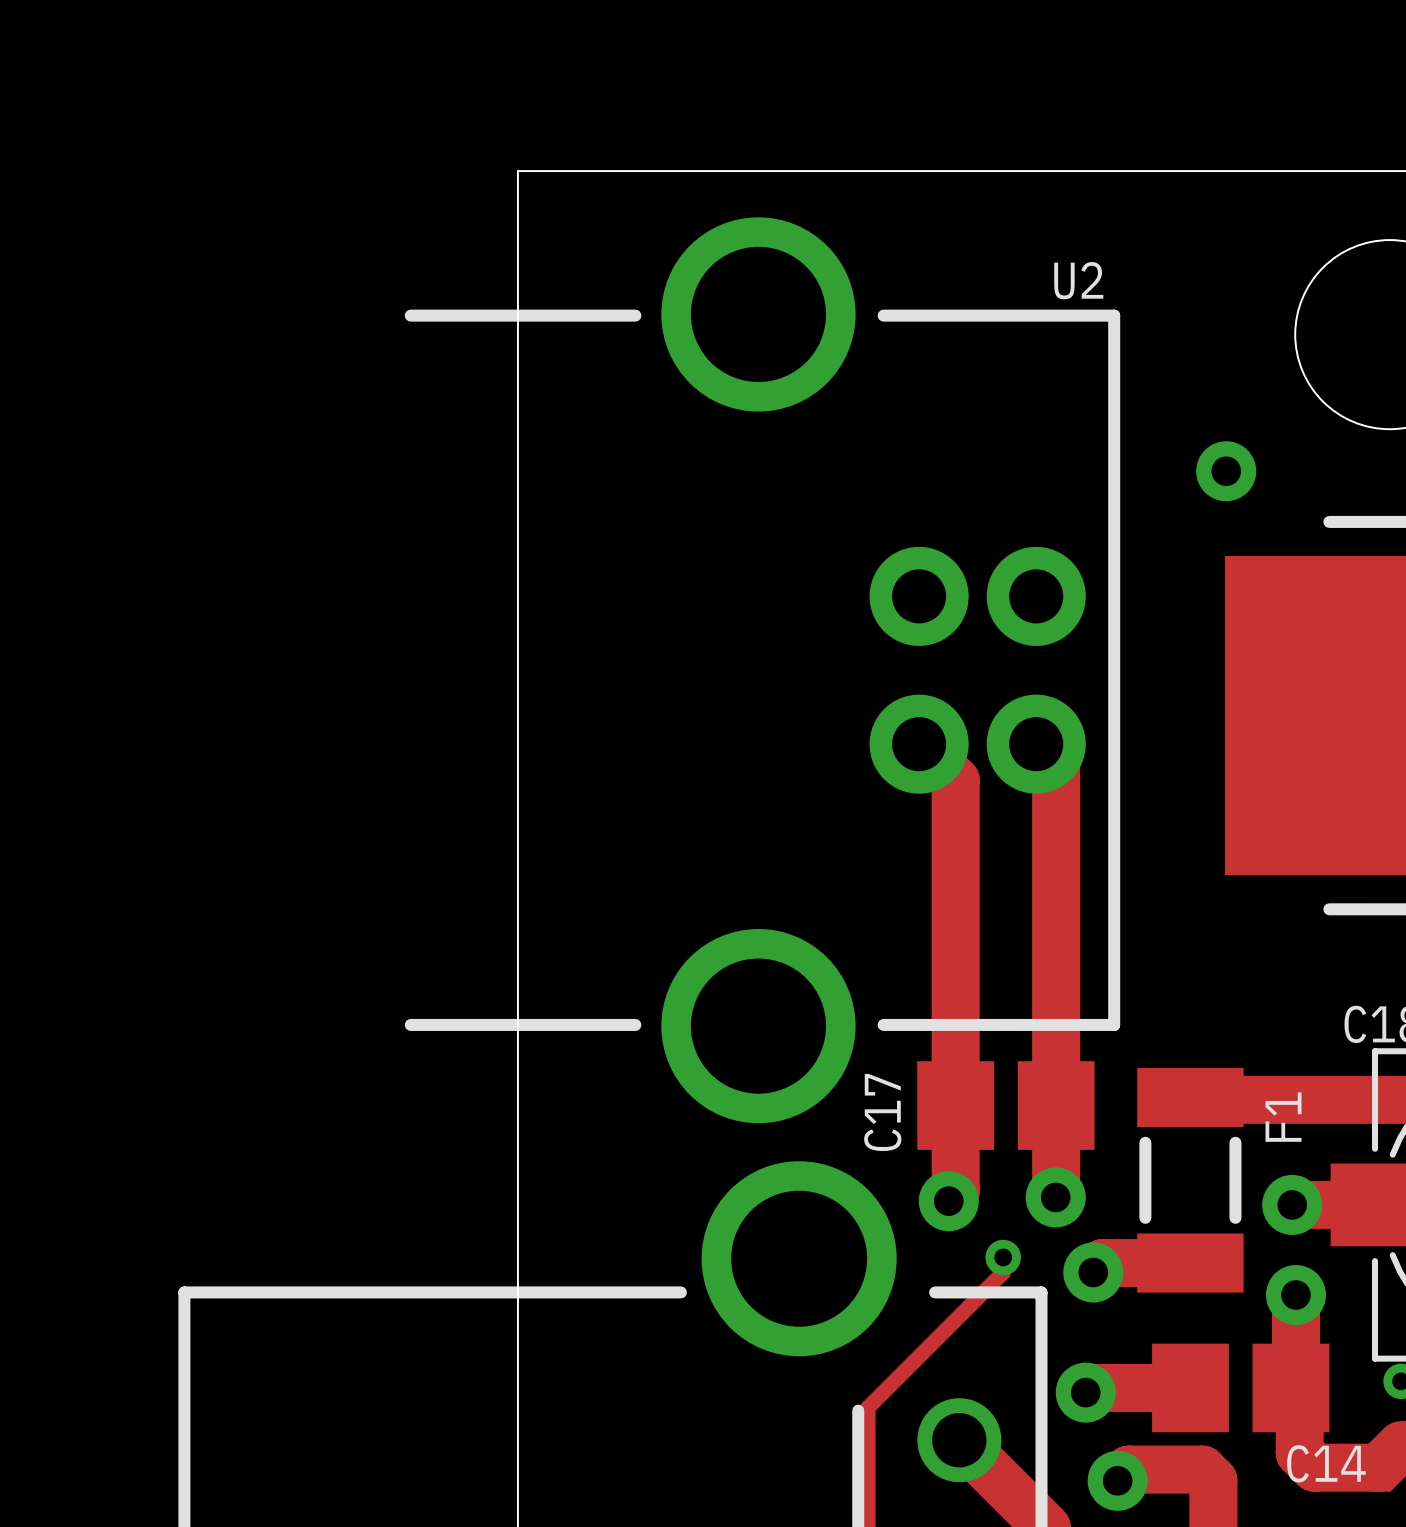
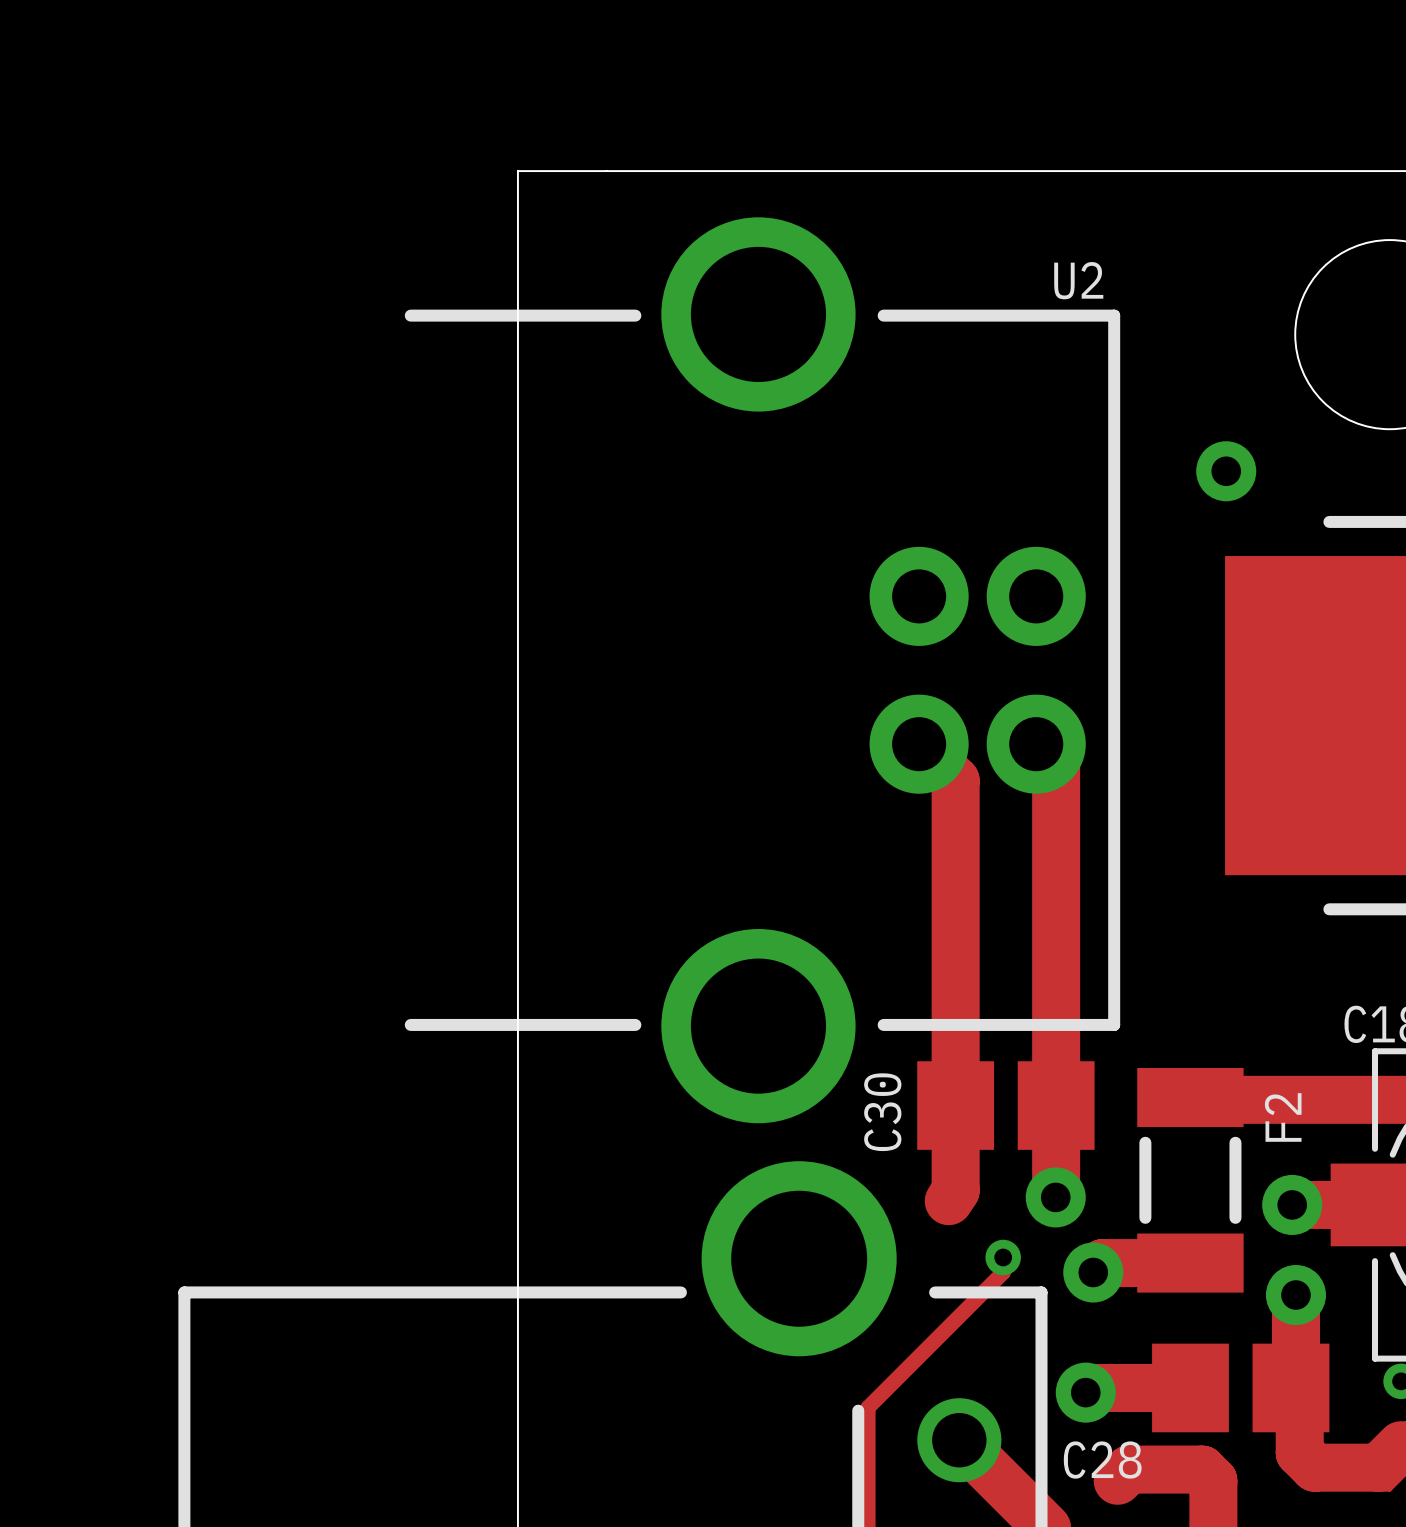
C17 name: C17 (882, 1112) -> C30 (882, 1112)
F1 name: F1 (1283, 1117) -> F2 (1283, 1117)
via: (948, 1201) -> none
C14 name: C14 (1326, 1463) -> C28 (1102, 1460)
via: (1117, 1480) -> none

